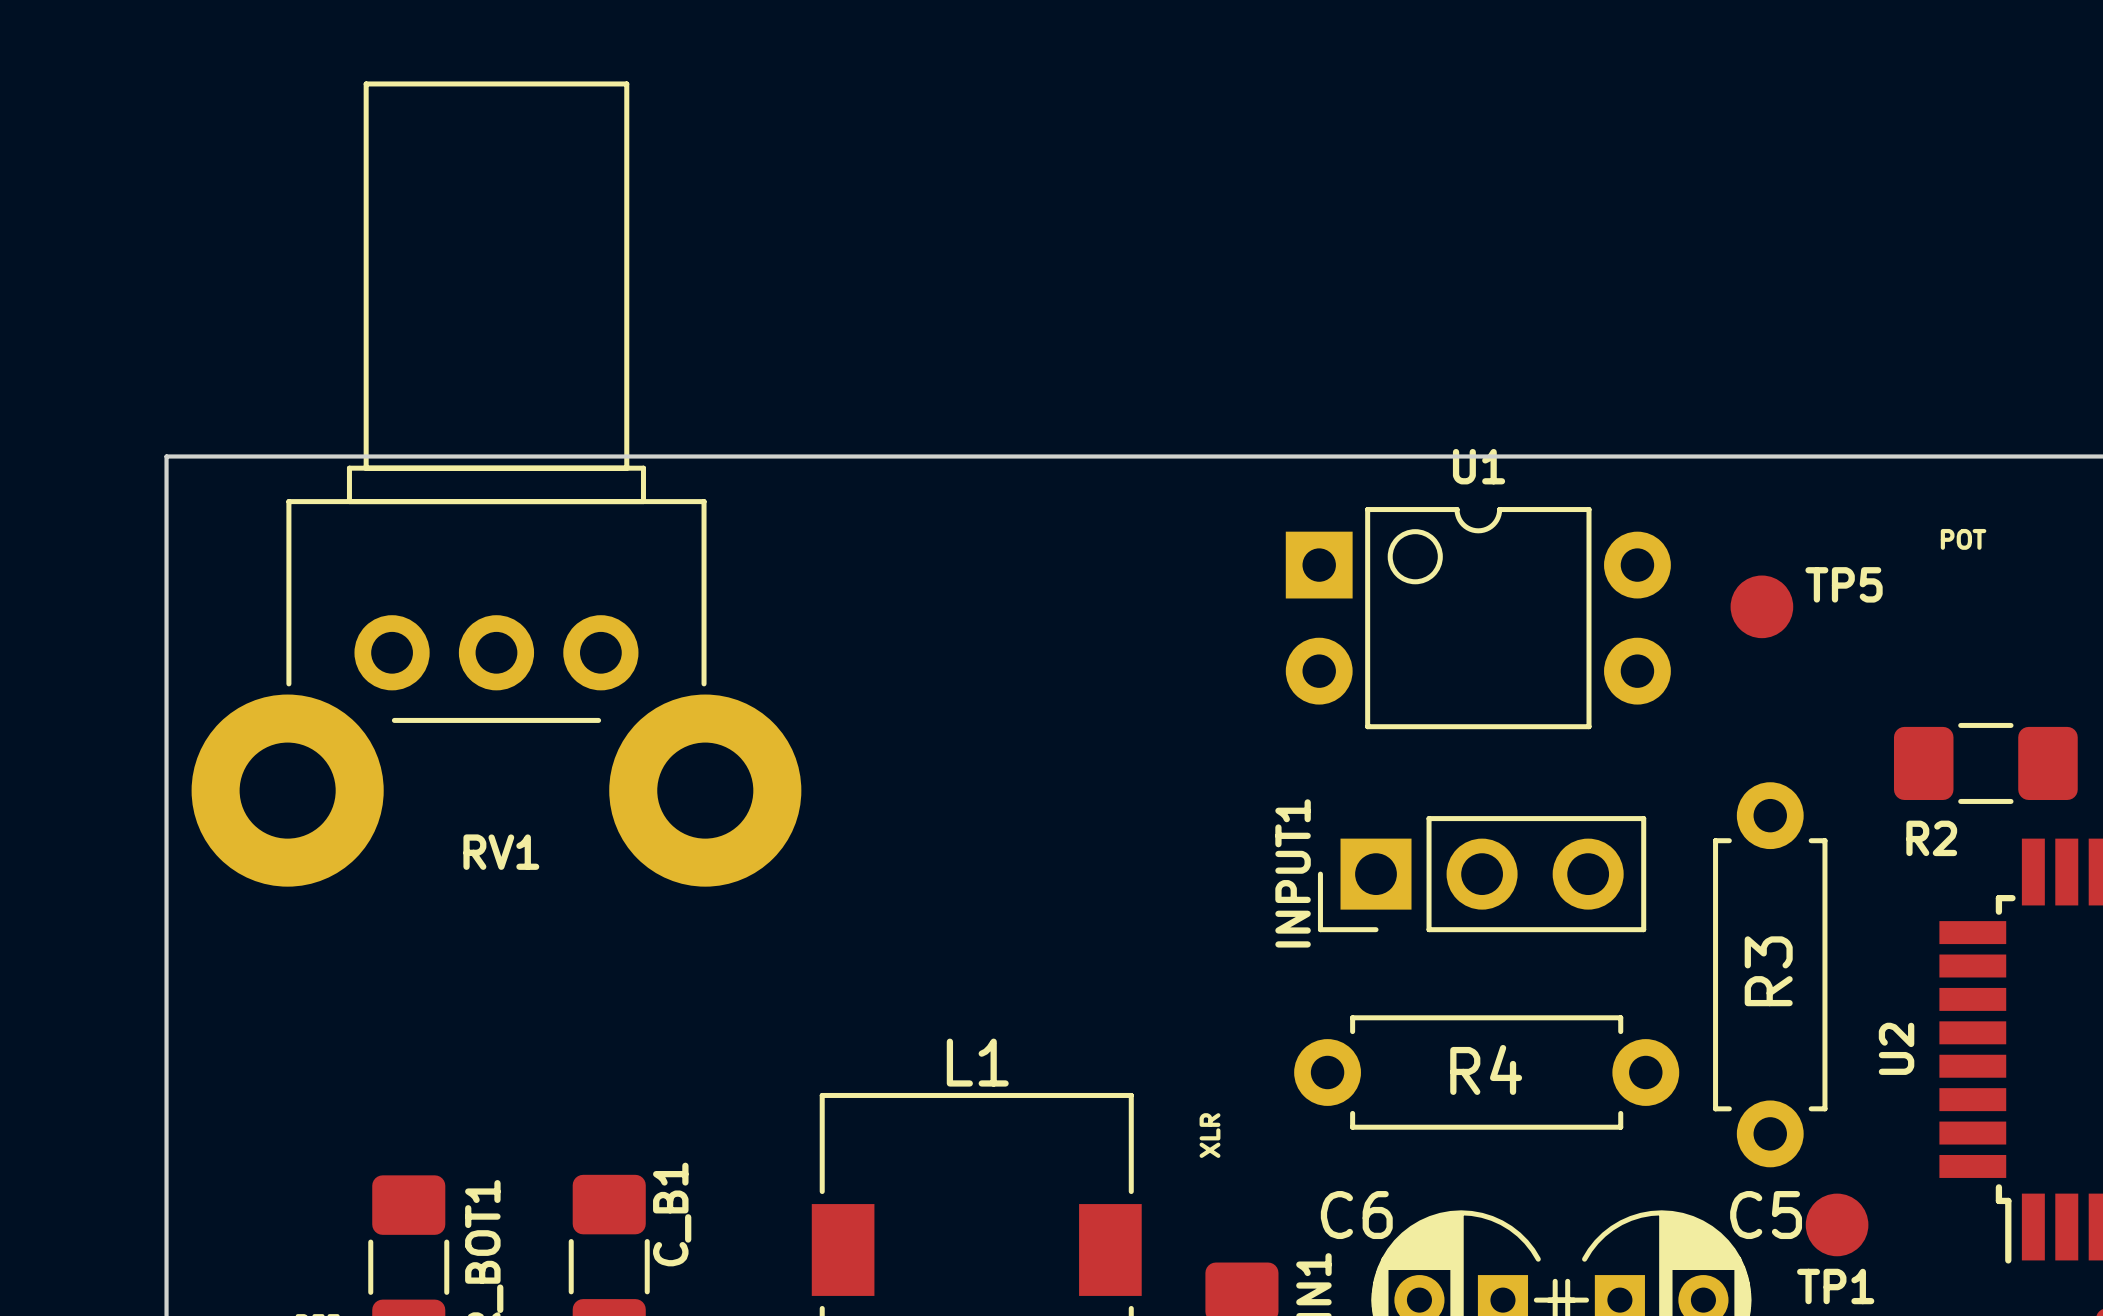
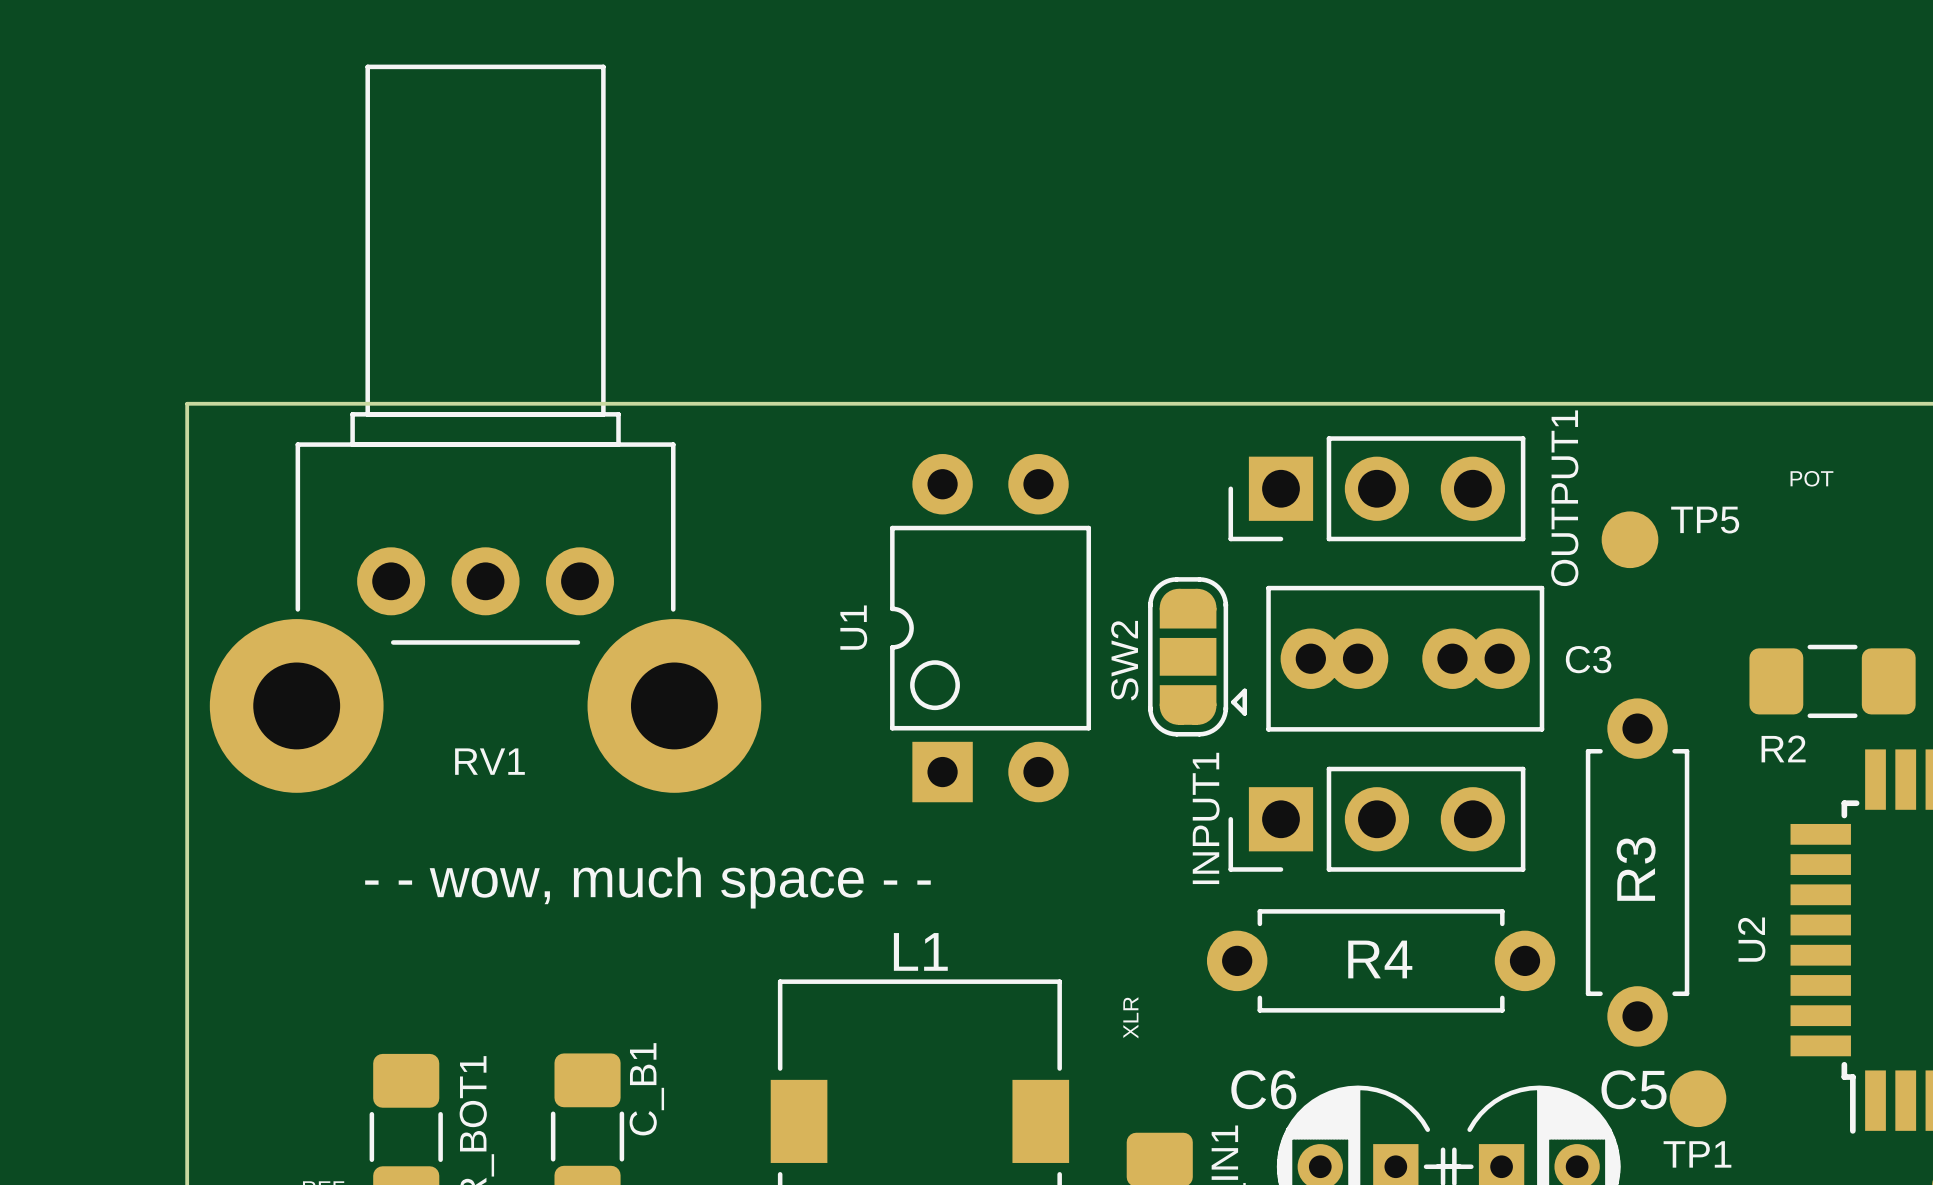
OUTPUT1: none -> (1376, 488)
U1 rotation: 0° (1478, 618) -> 90° counterclockwise (990, 628)
U1 position: (1478, 618) -> (990, 628)
SW2: none -> (1197, 656)
C3: none -> (1405, 658)
INPUT1 position: (1482, 874) -> (1376, 819)
text: none -> - - wow, much space - - (647, 882)

